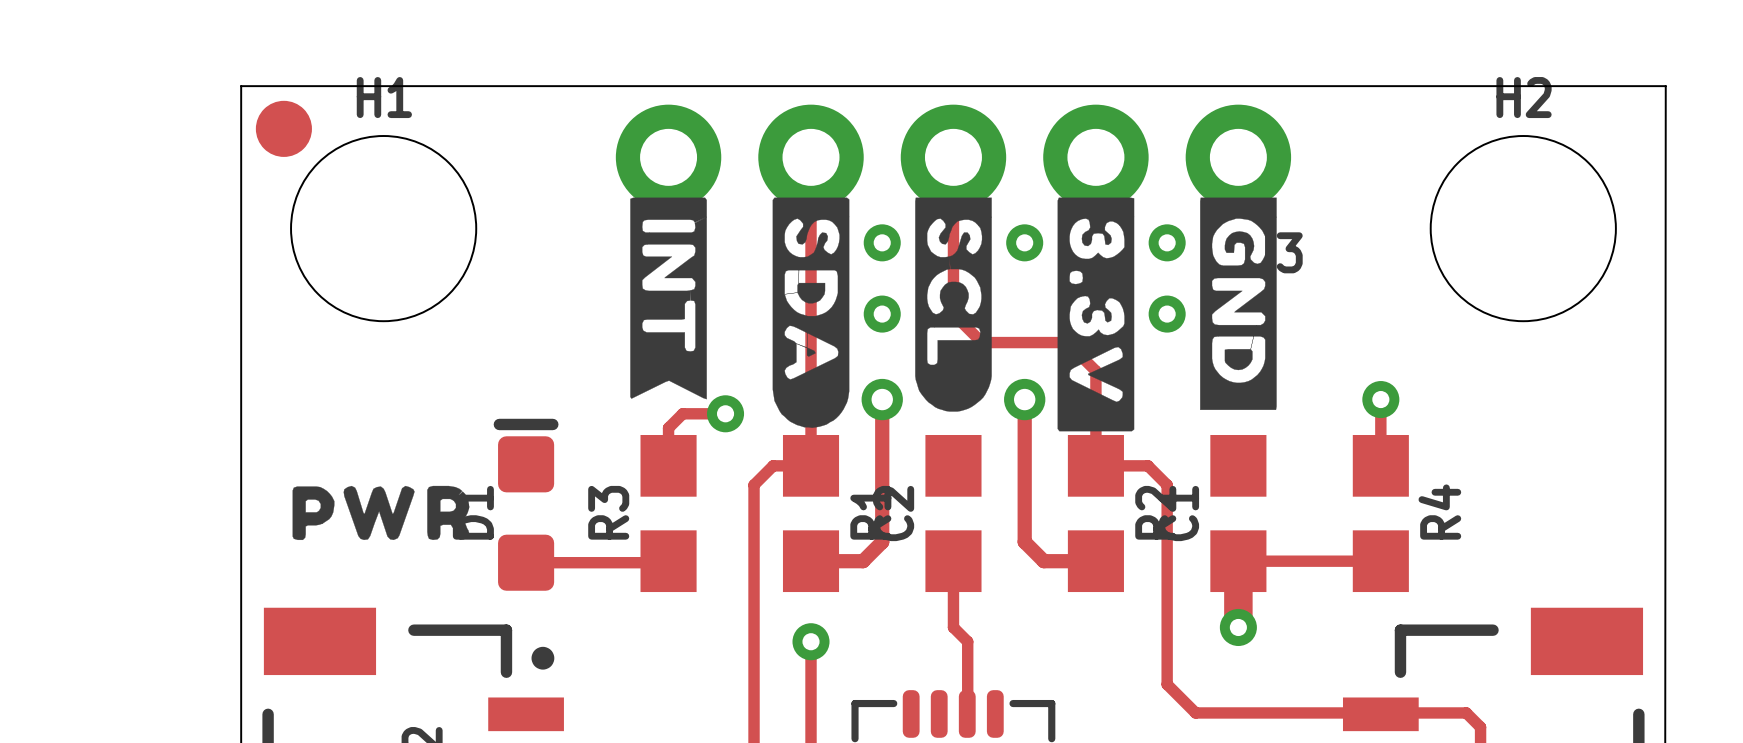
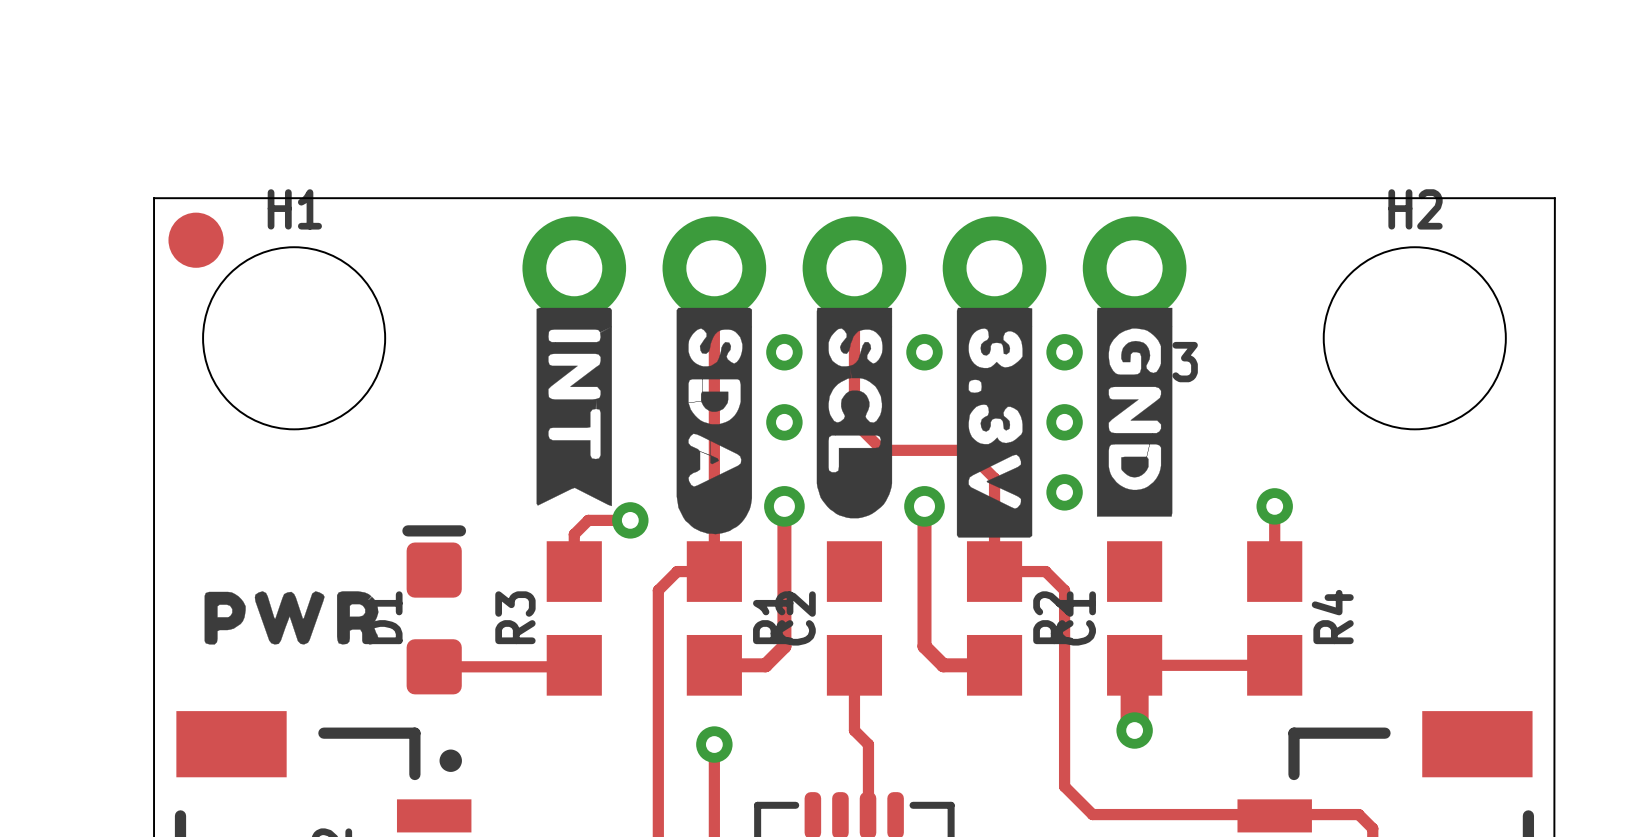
via: none -> (1064, 492)

